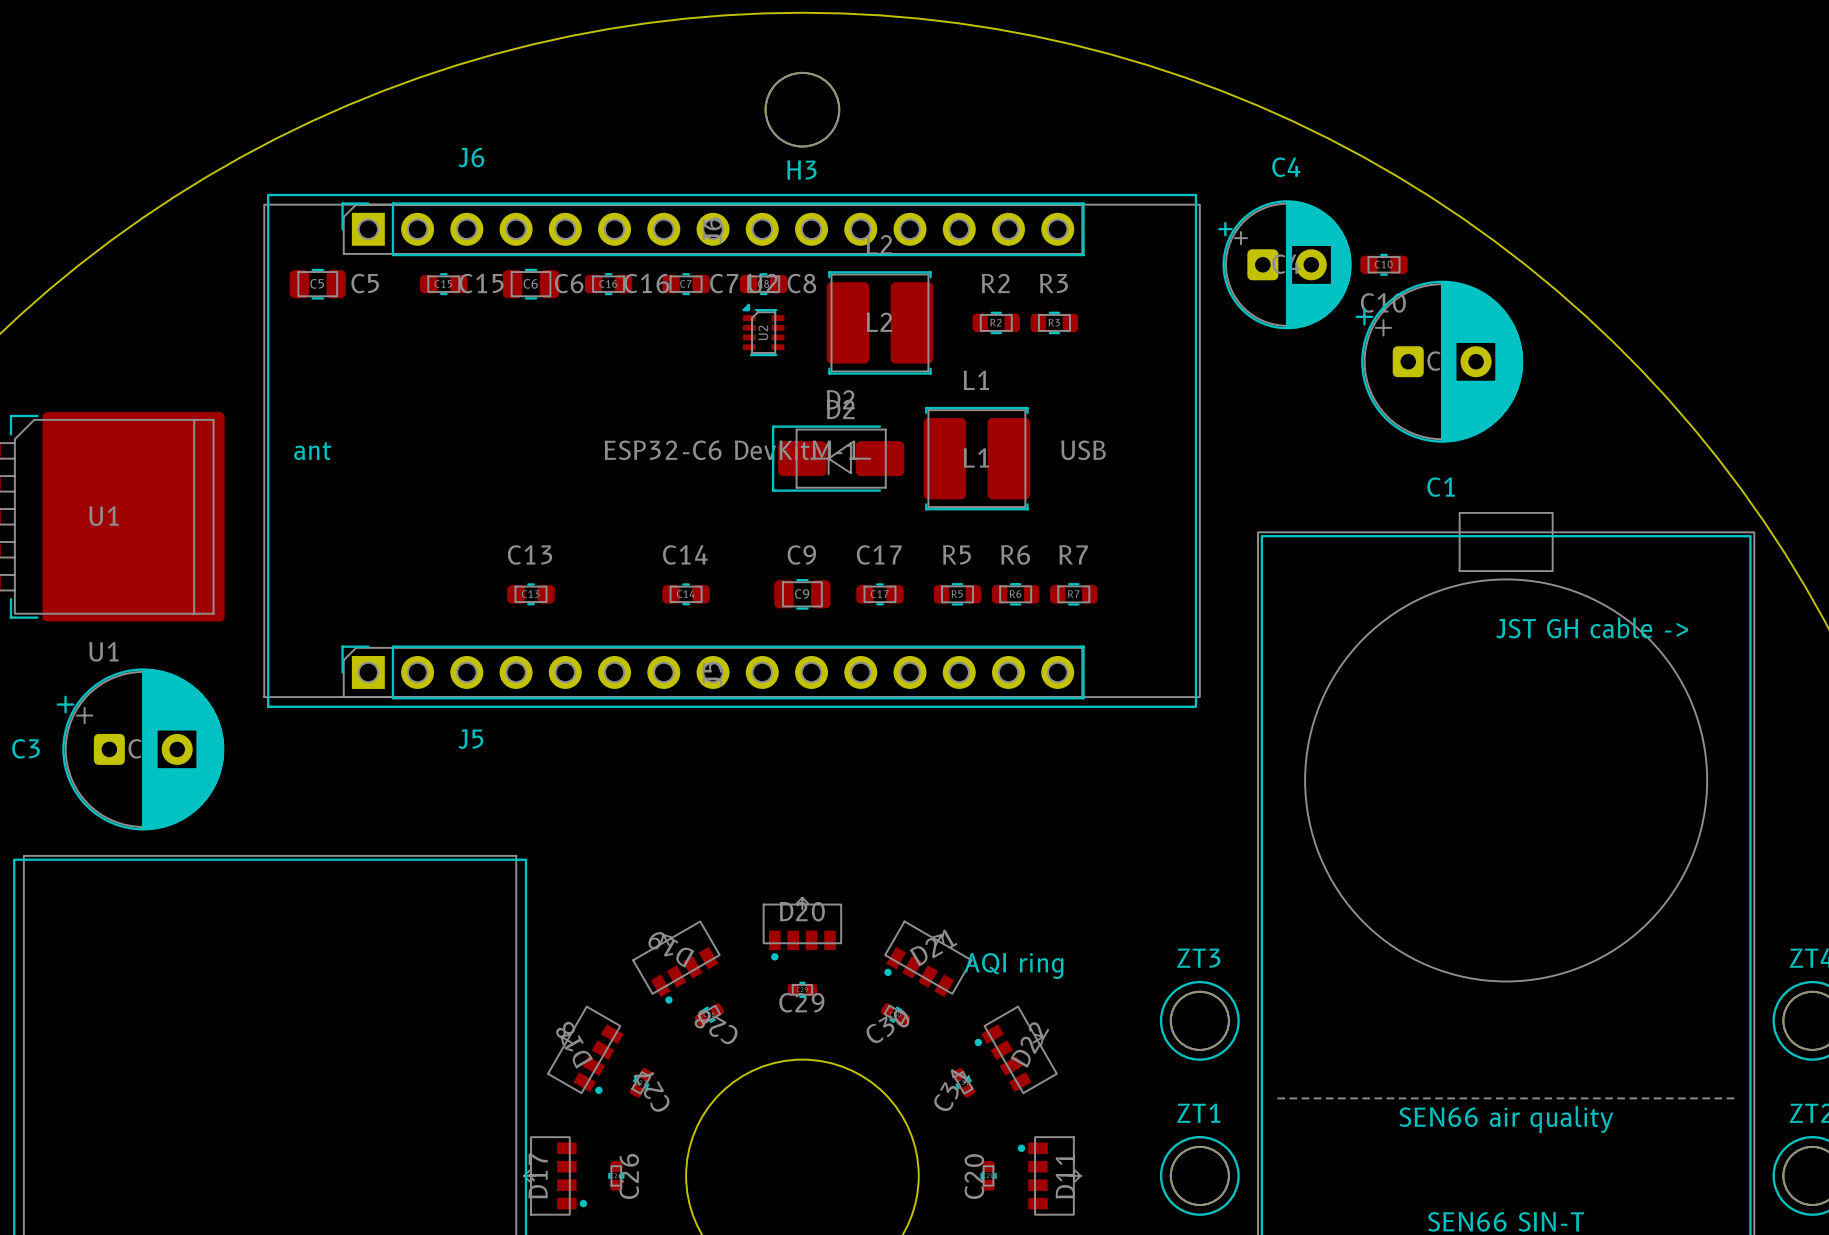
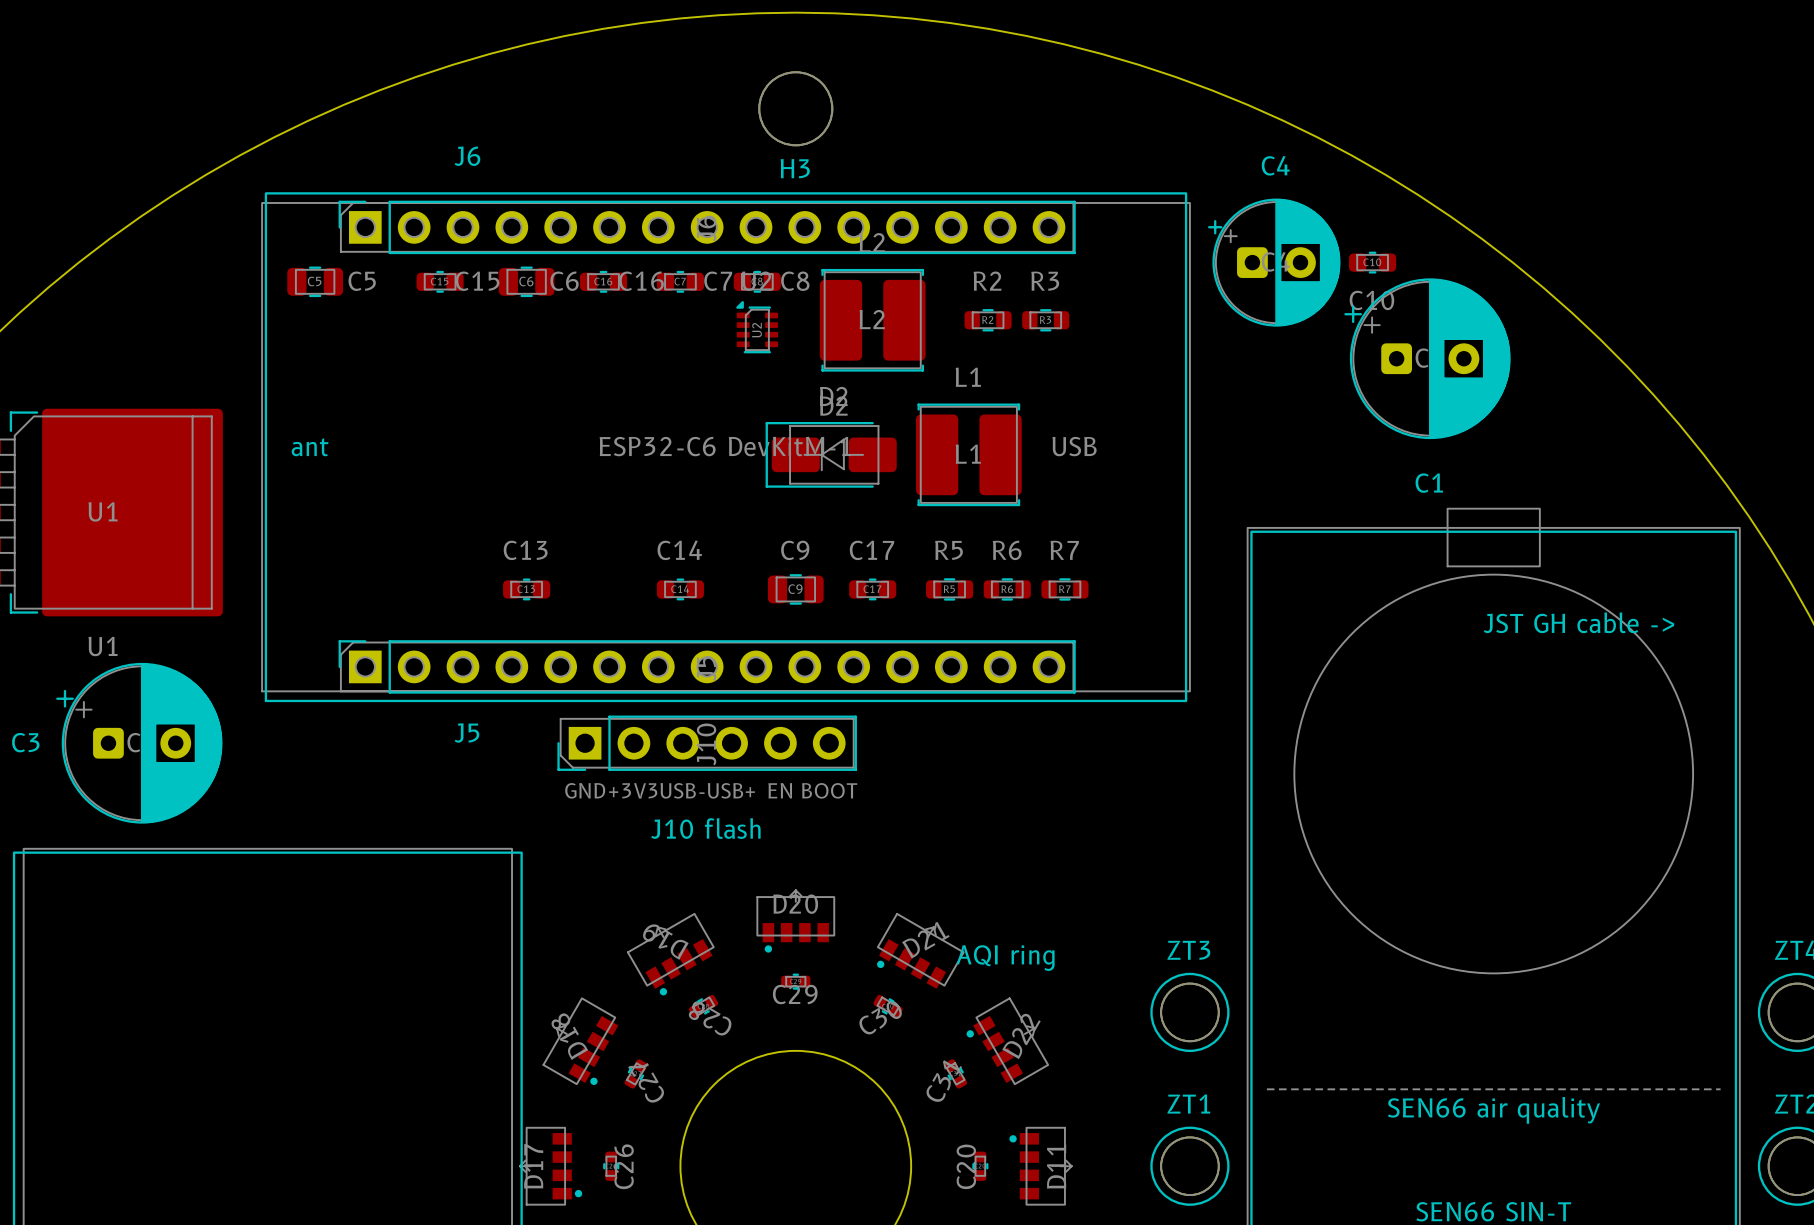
part: none -> (707, 743)
text: none -> GND (585, 790)
text: none -> +3V3 (633, 790)
text: none -> USB- (682, 790)
text: none -> USB+ (731, 790)
text: none -> EN (780, 790)
text: none -> BOOT (829, 790)
text: none -> J10 flash (705, 828)

